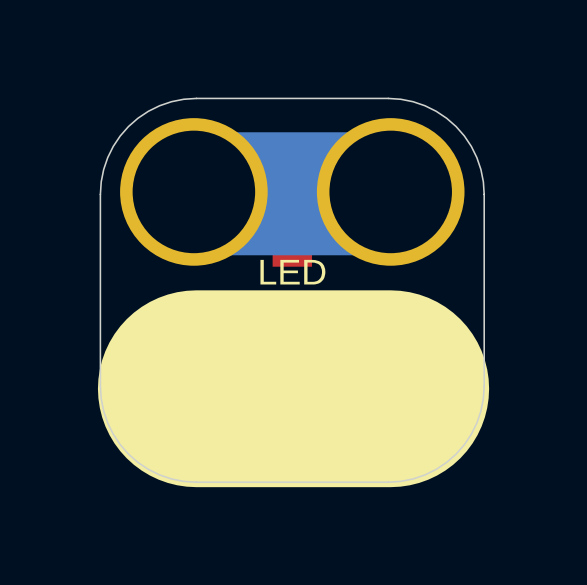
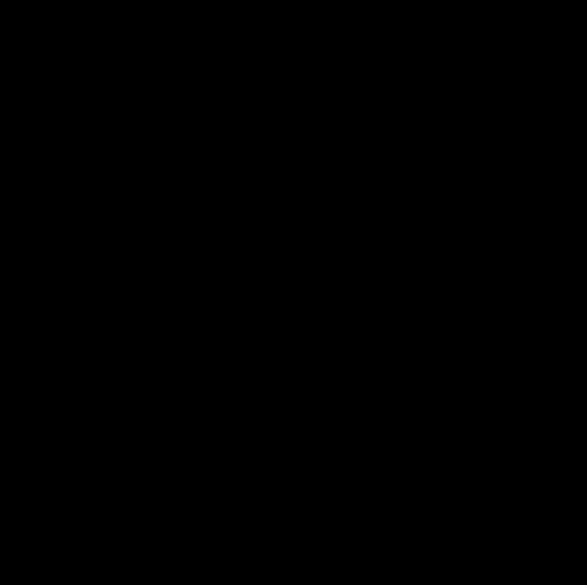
LED: (293, 292) -> none

